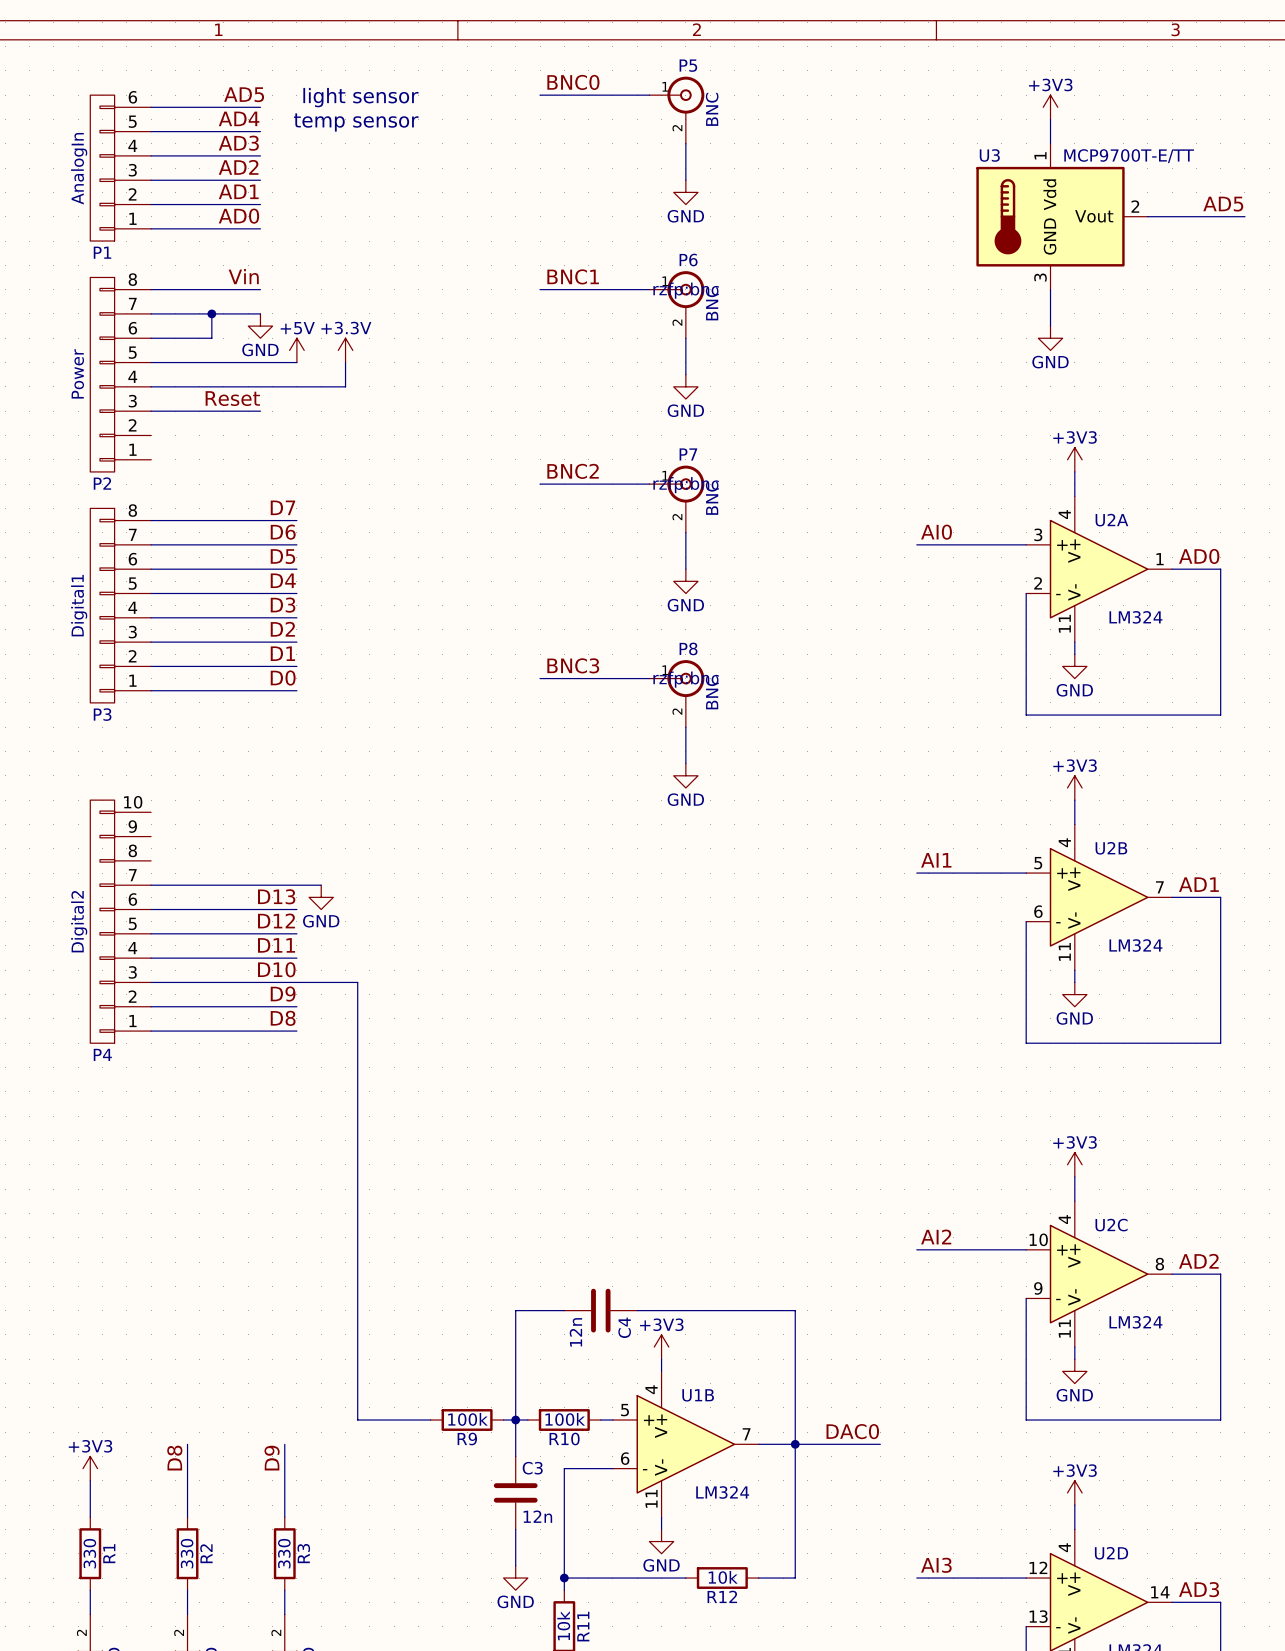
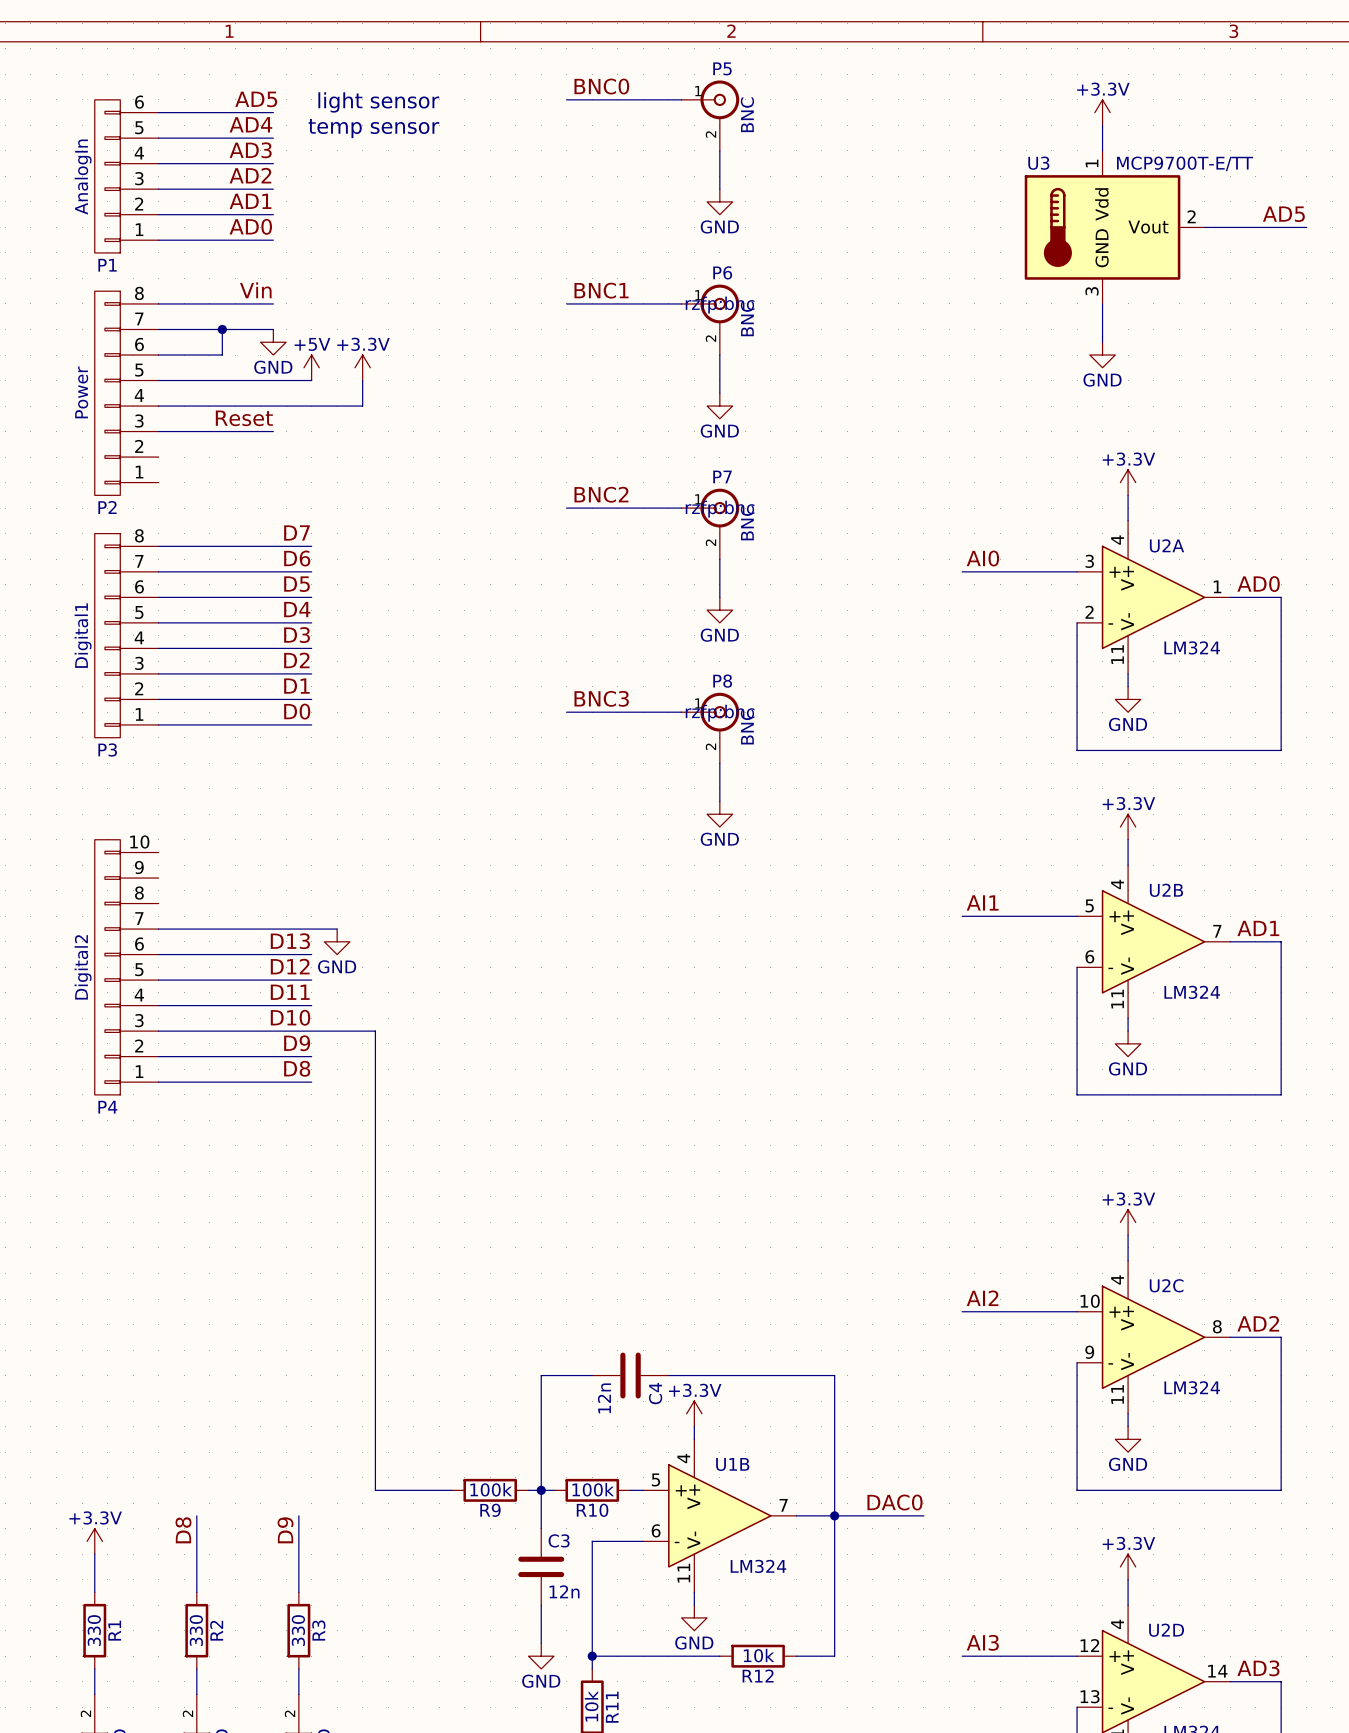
power symbol: +3V3 (1050, 107) -> +3.3V (1102, 112)
power symbol: +3V3 (1074, 459) -> +3.3V (1128, 482)
power symbol: +3V3 (1074, 787) -> +3.3V (1128, 827)
power symbol: +3V3 (1074, 1164) -> +3.3V (1128, 1222)
power symbol: +3V3 (661, 1347) -> +3.3V (694, 1413)
power symbol: +3V3 (90, 1468) -> +3.3V (94, 1541)
power symbol: +3V3 (1074, 1492) -> +3.3V (1128, 1566)

